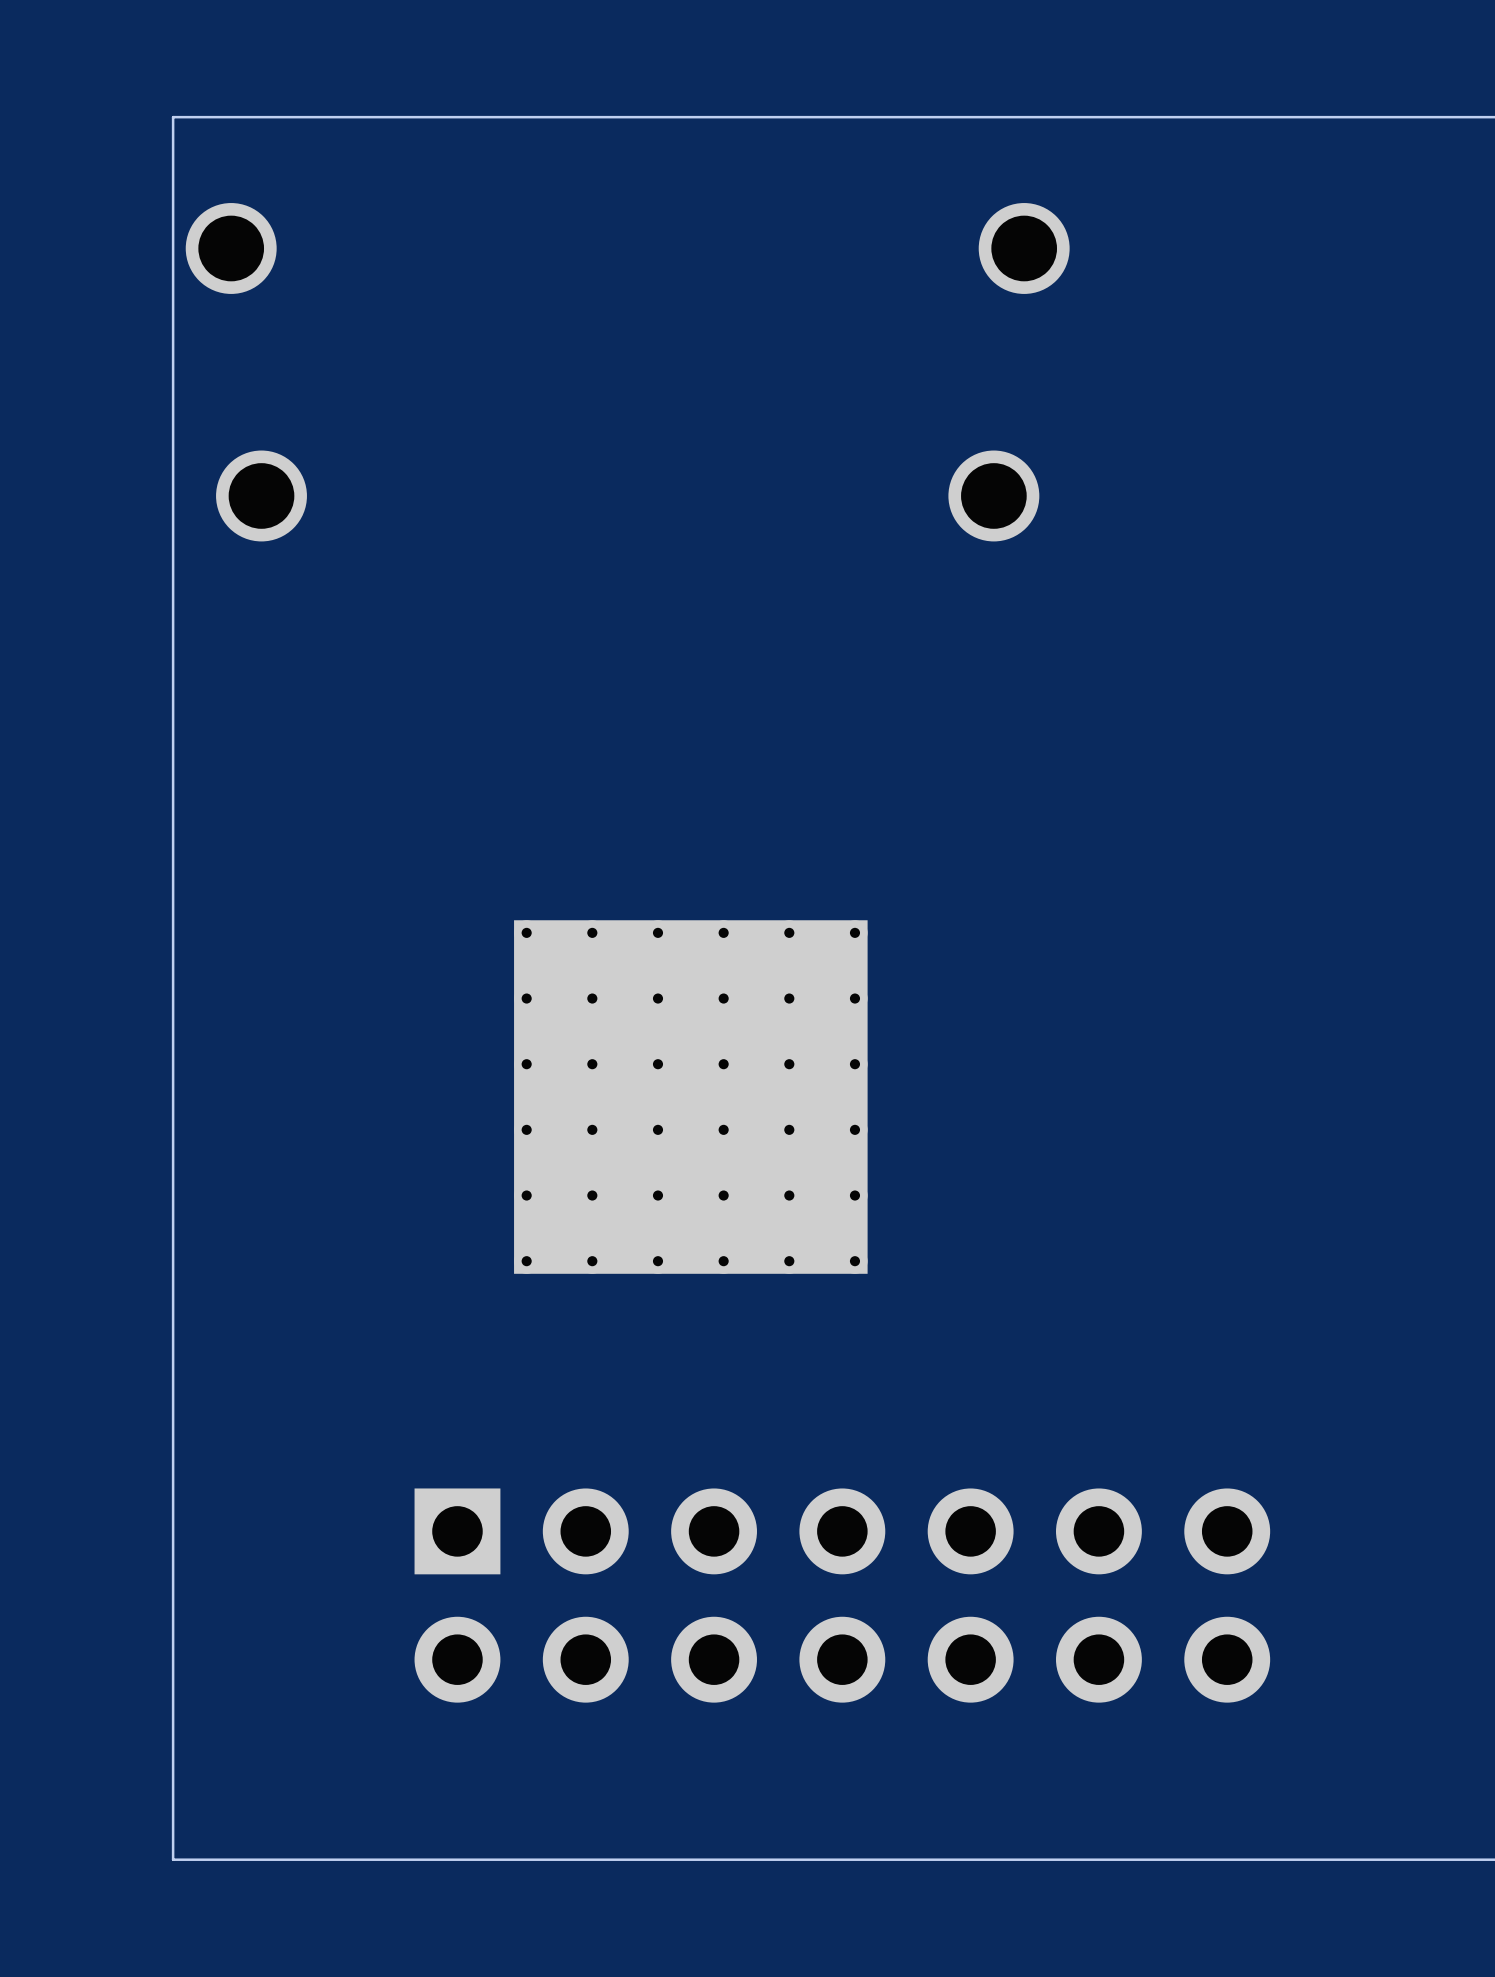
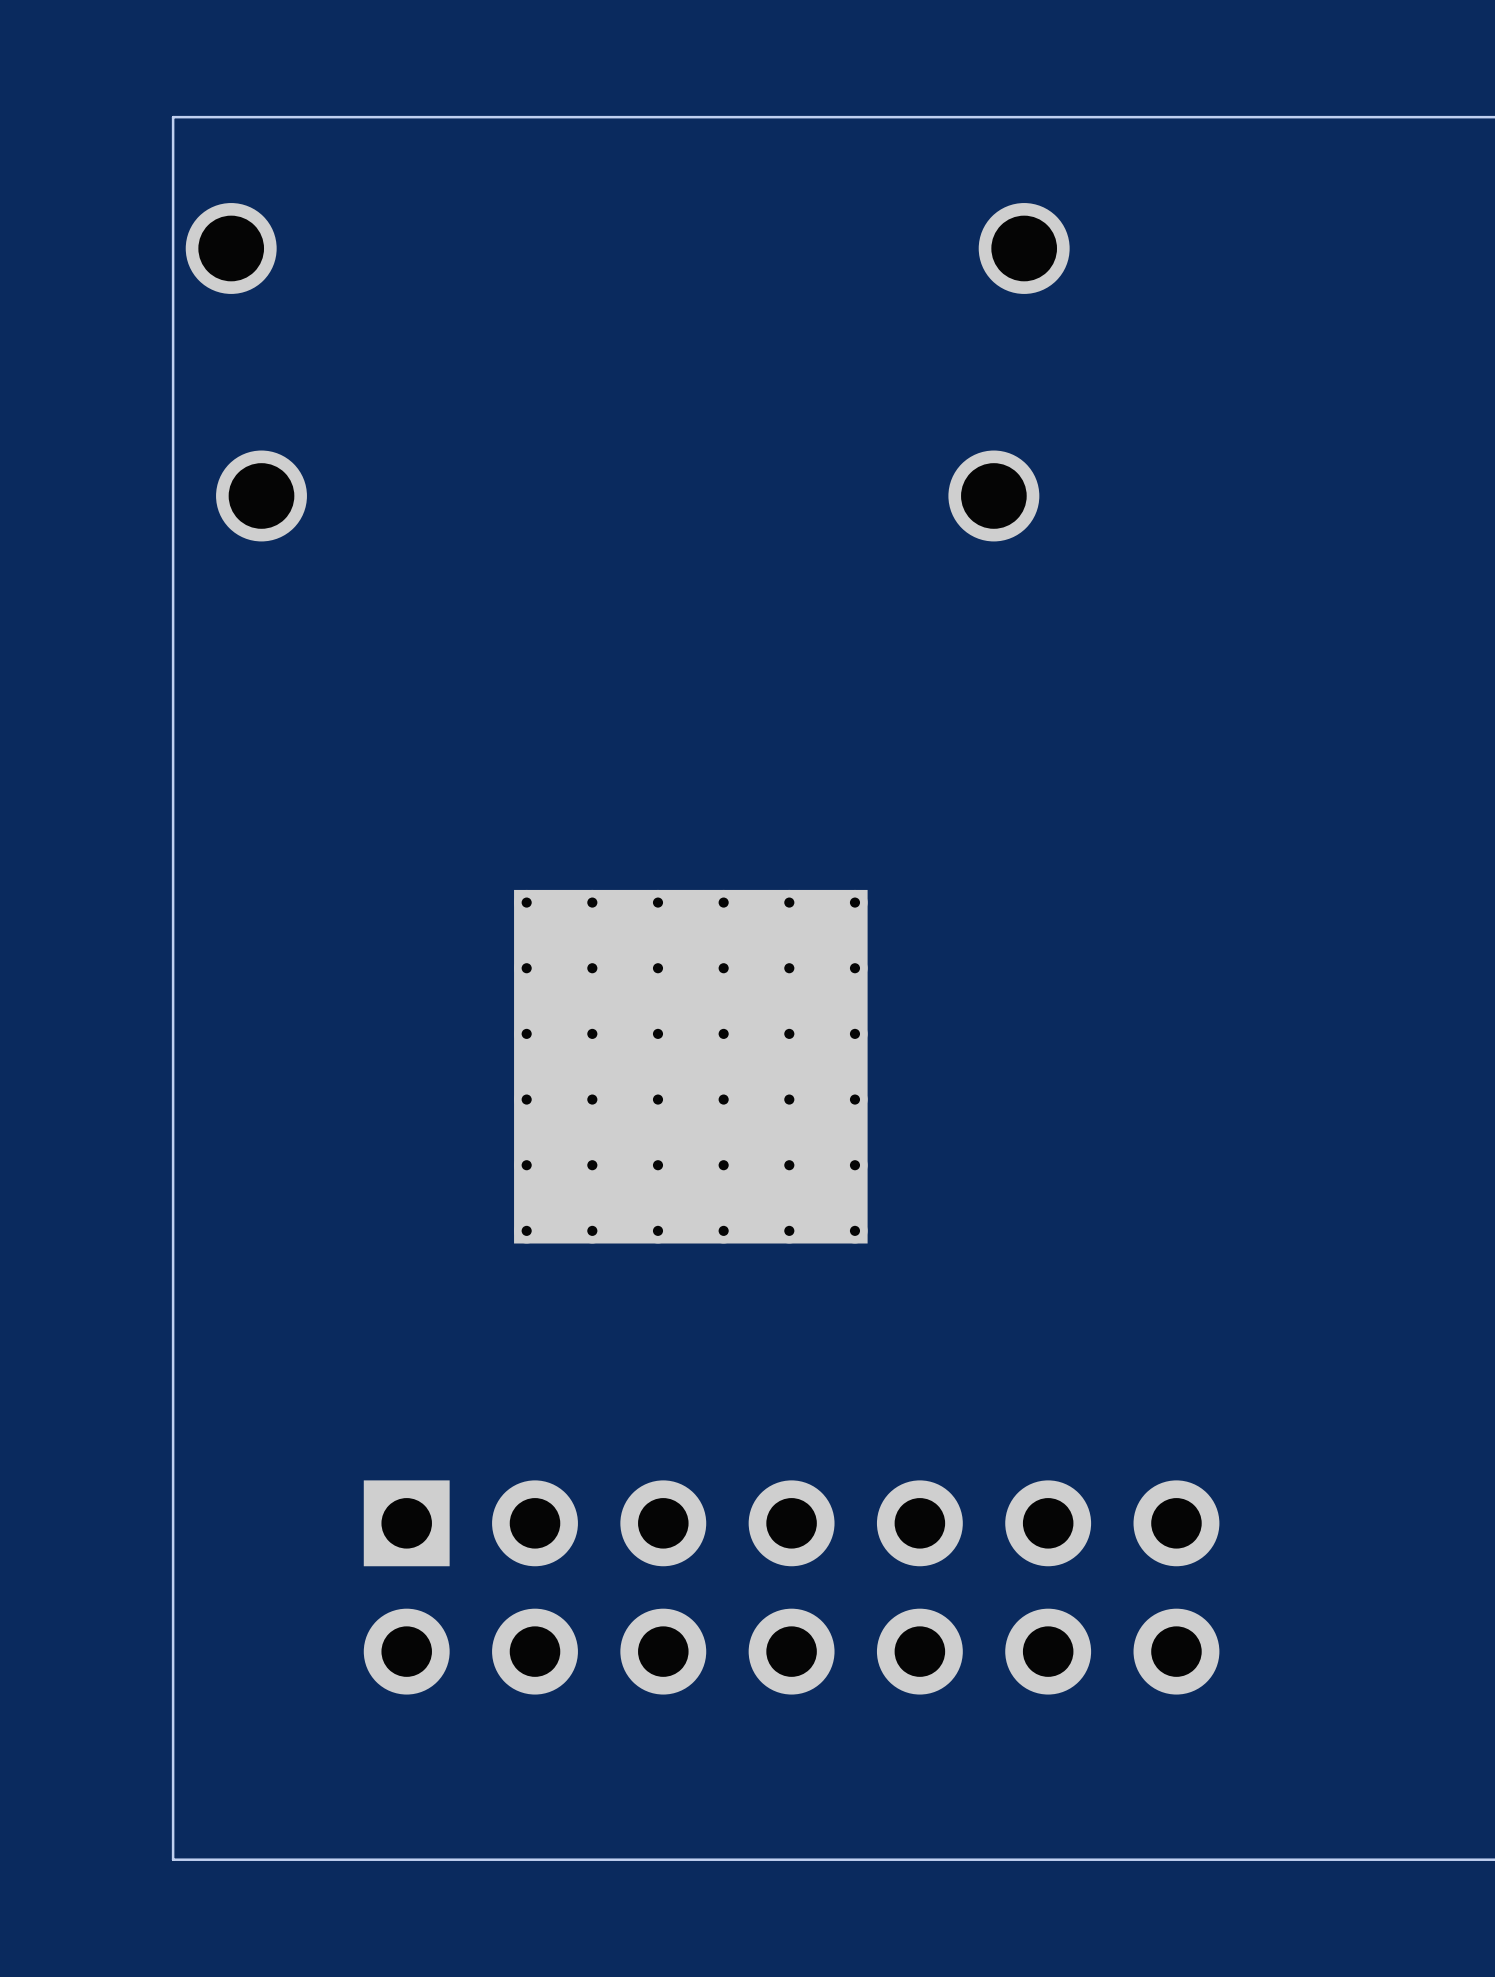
part position: (690, 1097) -> (690, 1066)
part position: (842, 1595) -> (791, 1587)

